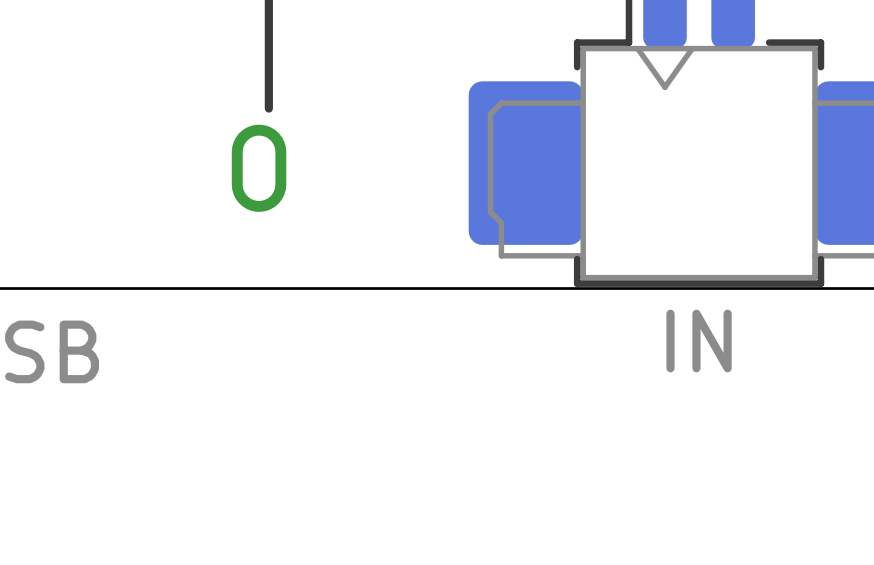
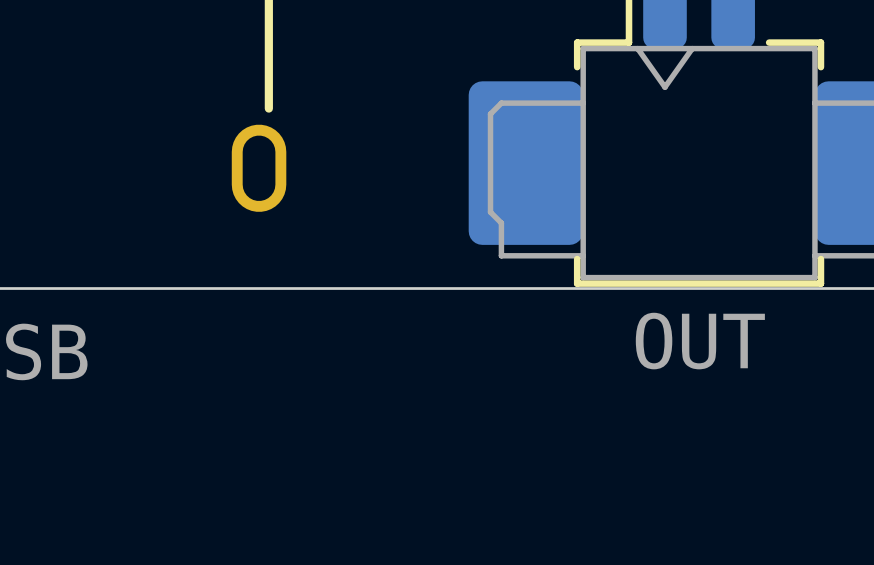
part value: IN (699, 341) -> OUT (700, 341)

